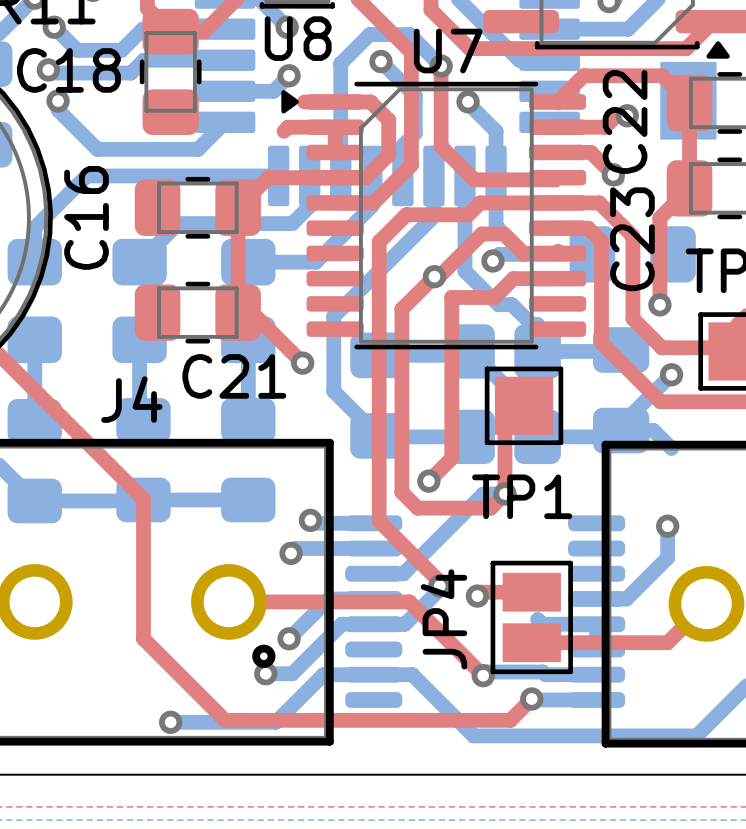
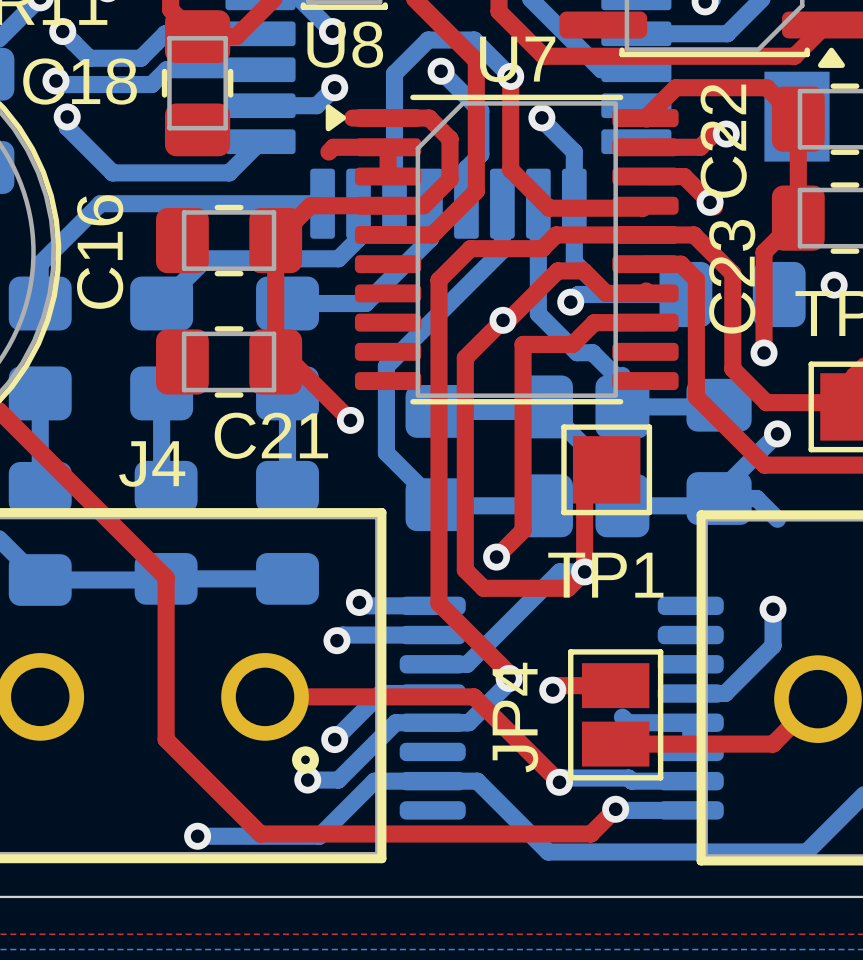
via: none -> (834, 285)

